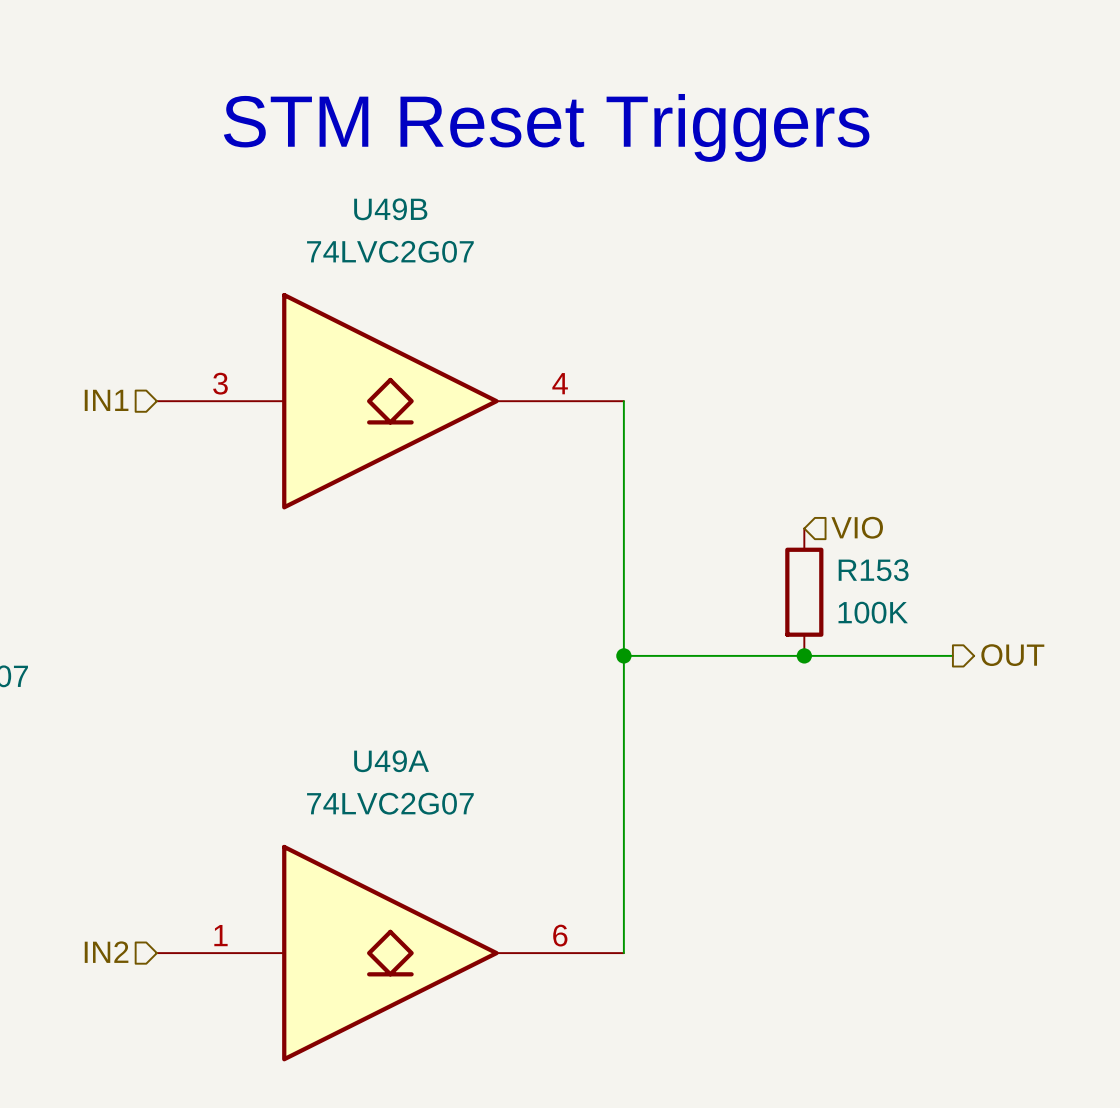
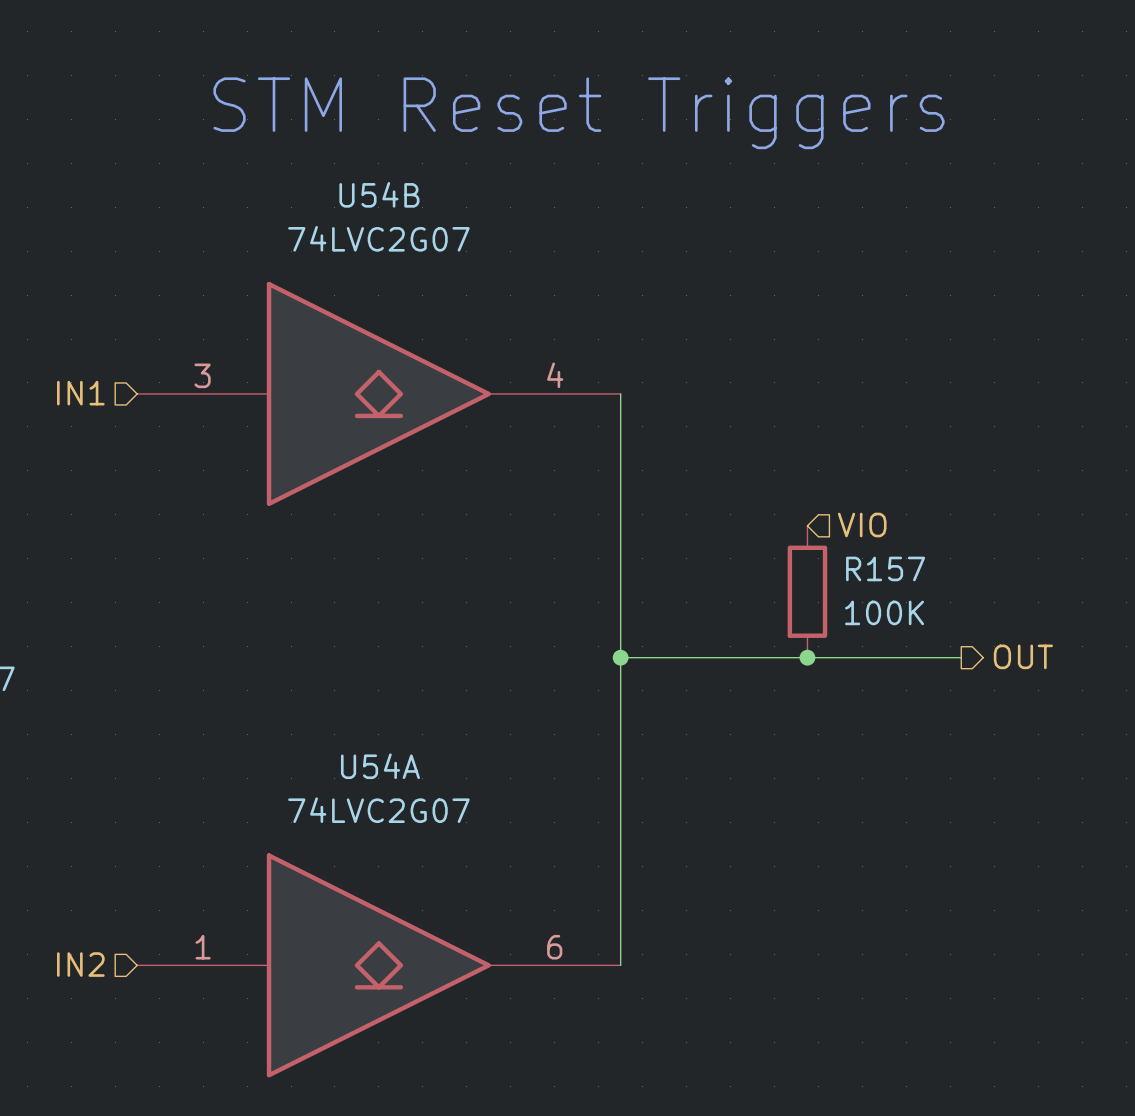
U49B name: U49B (390, 209) -> U54B (379, 194)
R153 name: R153 (873, 570) -> R157 (885, 568)
U49A name: U49A (391, 761) -> U54A (380, 766)

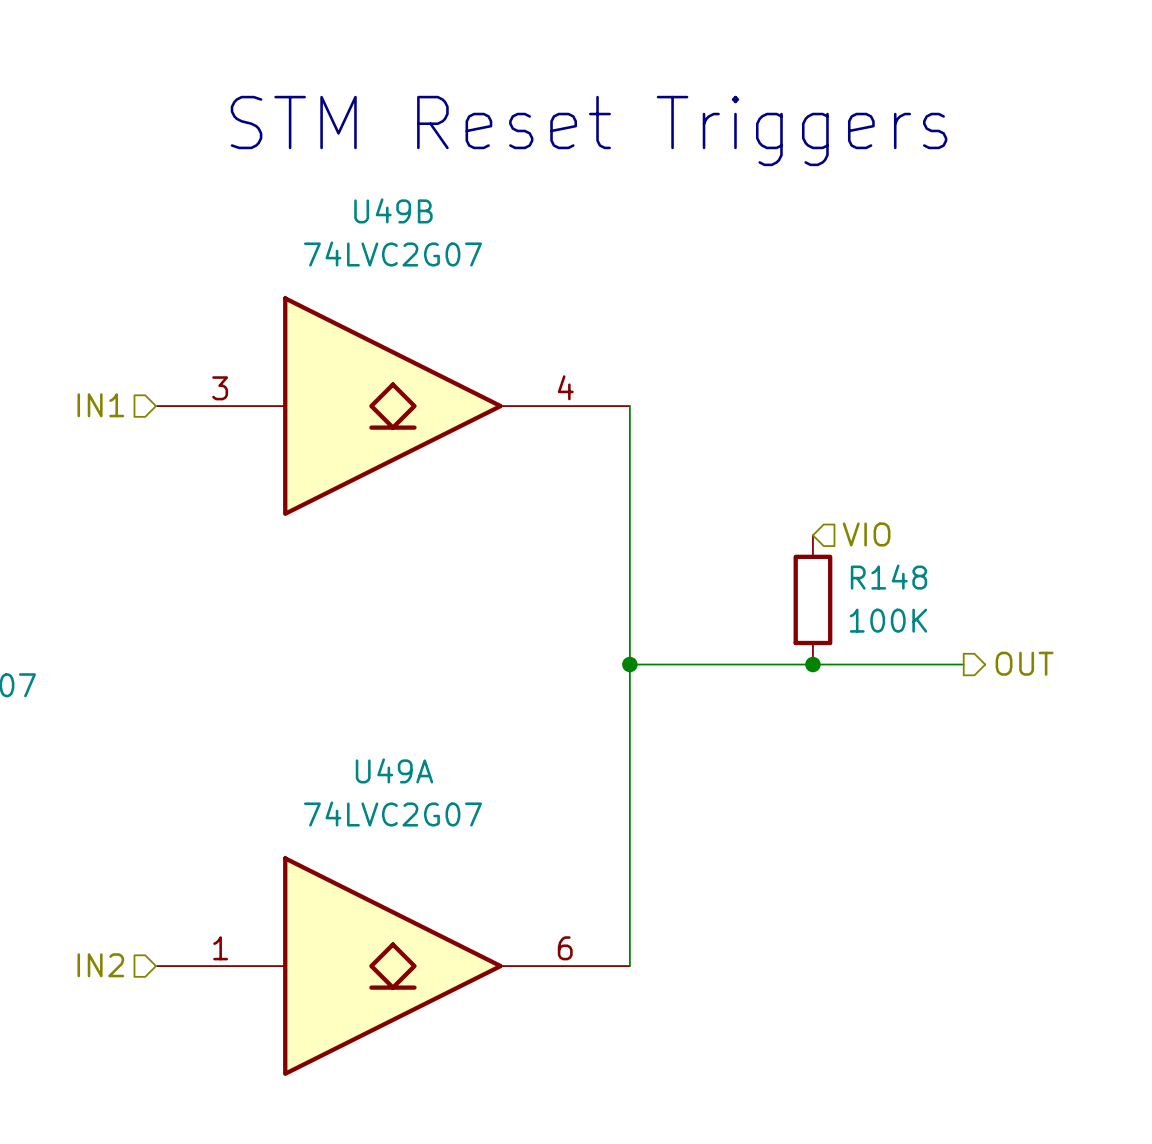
U54B name: U54B (379, 194) -> U49B (393, 210)
R157 name: R157 (885, 568) -> R148 (889, 577)
U54A name: U54A (380, 766) -> U49A (394, 770)

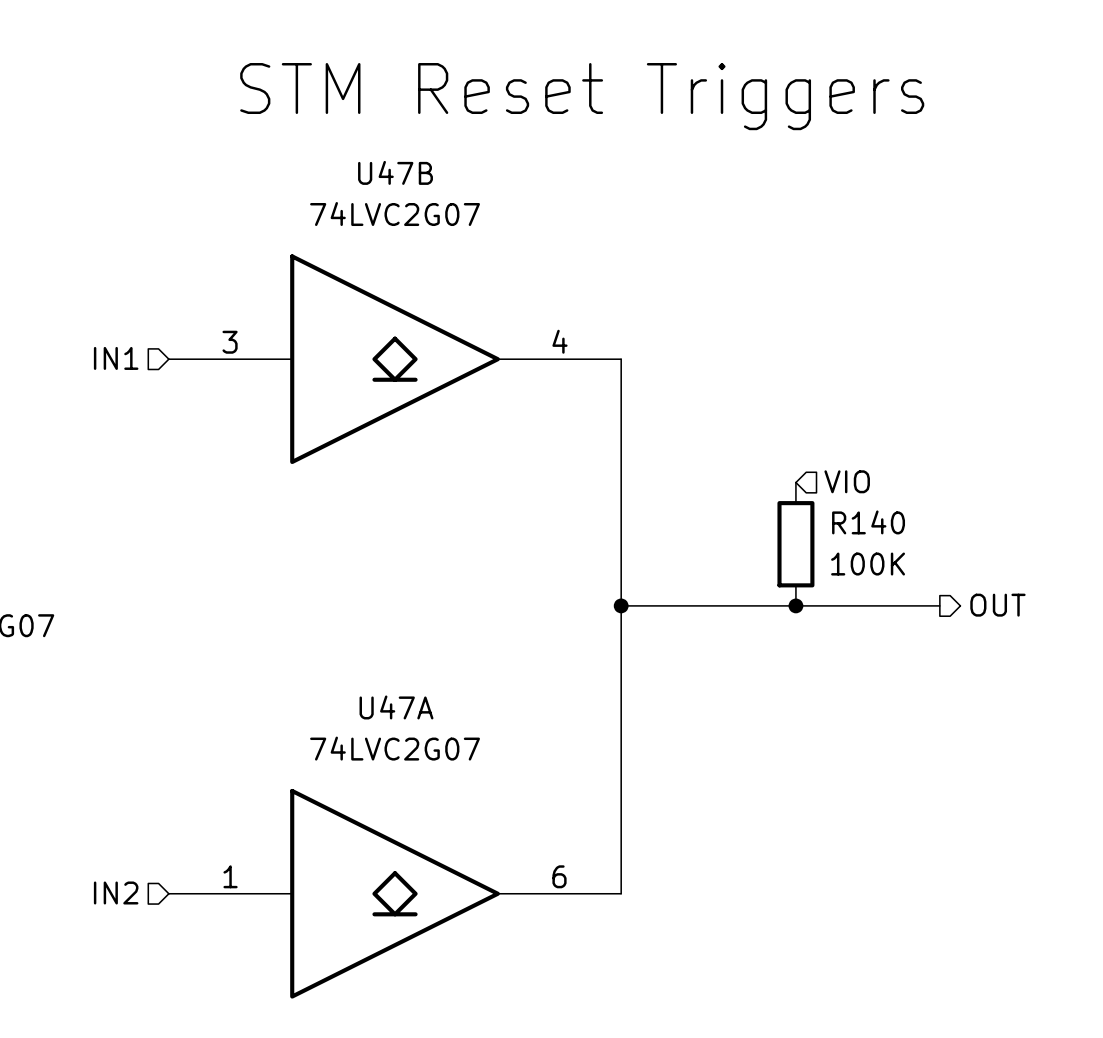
U49B name: U49B (393, 210) -> U47B (395, 172)
R148 name: R148 (889, 577) -> R140 (868, 522)
U49A name: U49A (394, 770) -> U47A (396, 707)

